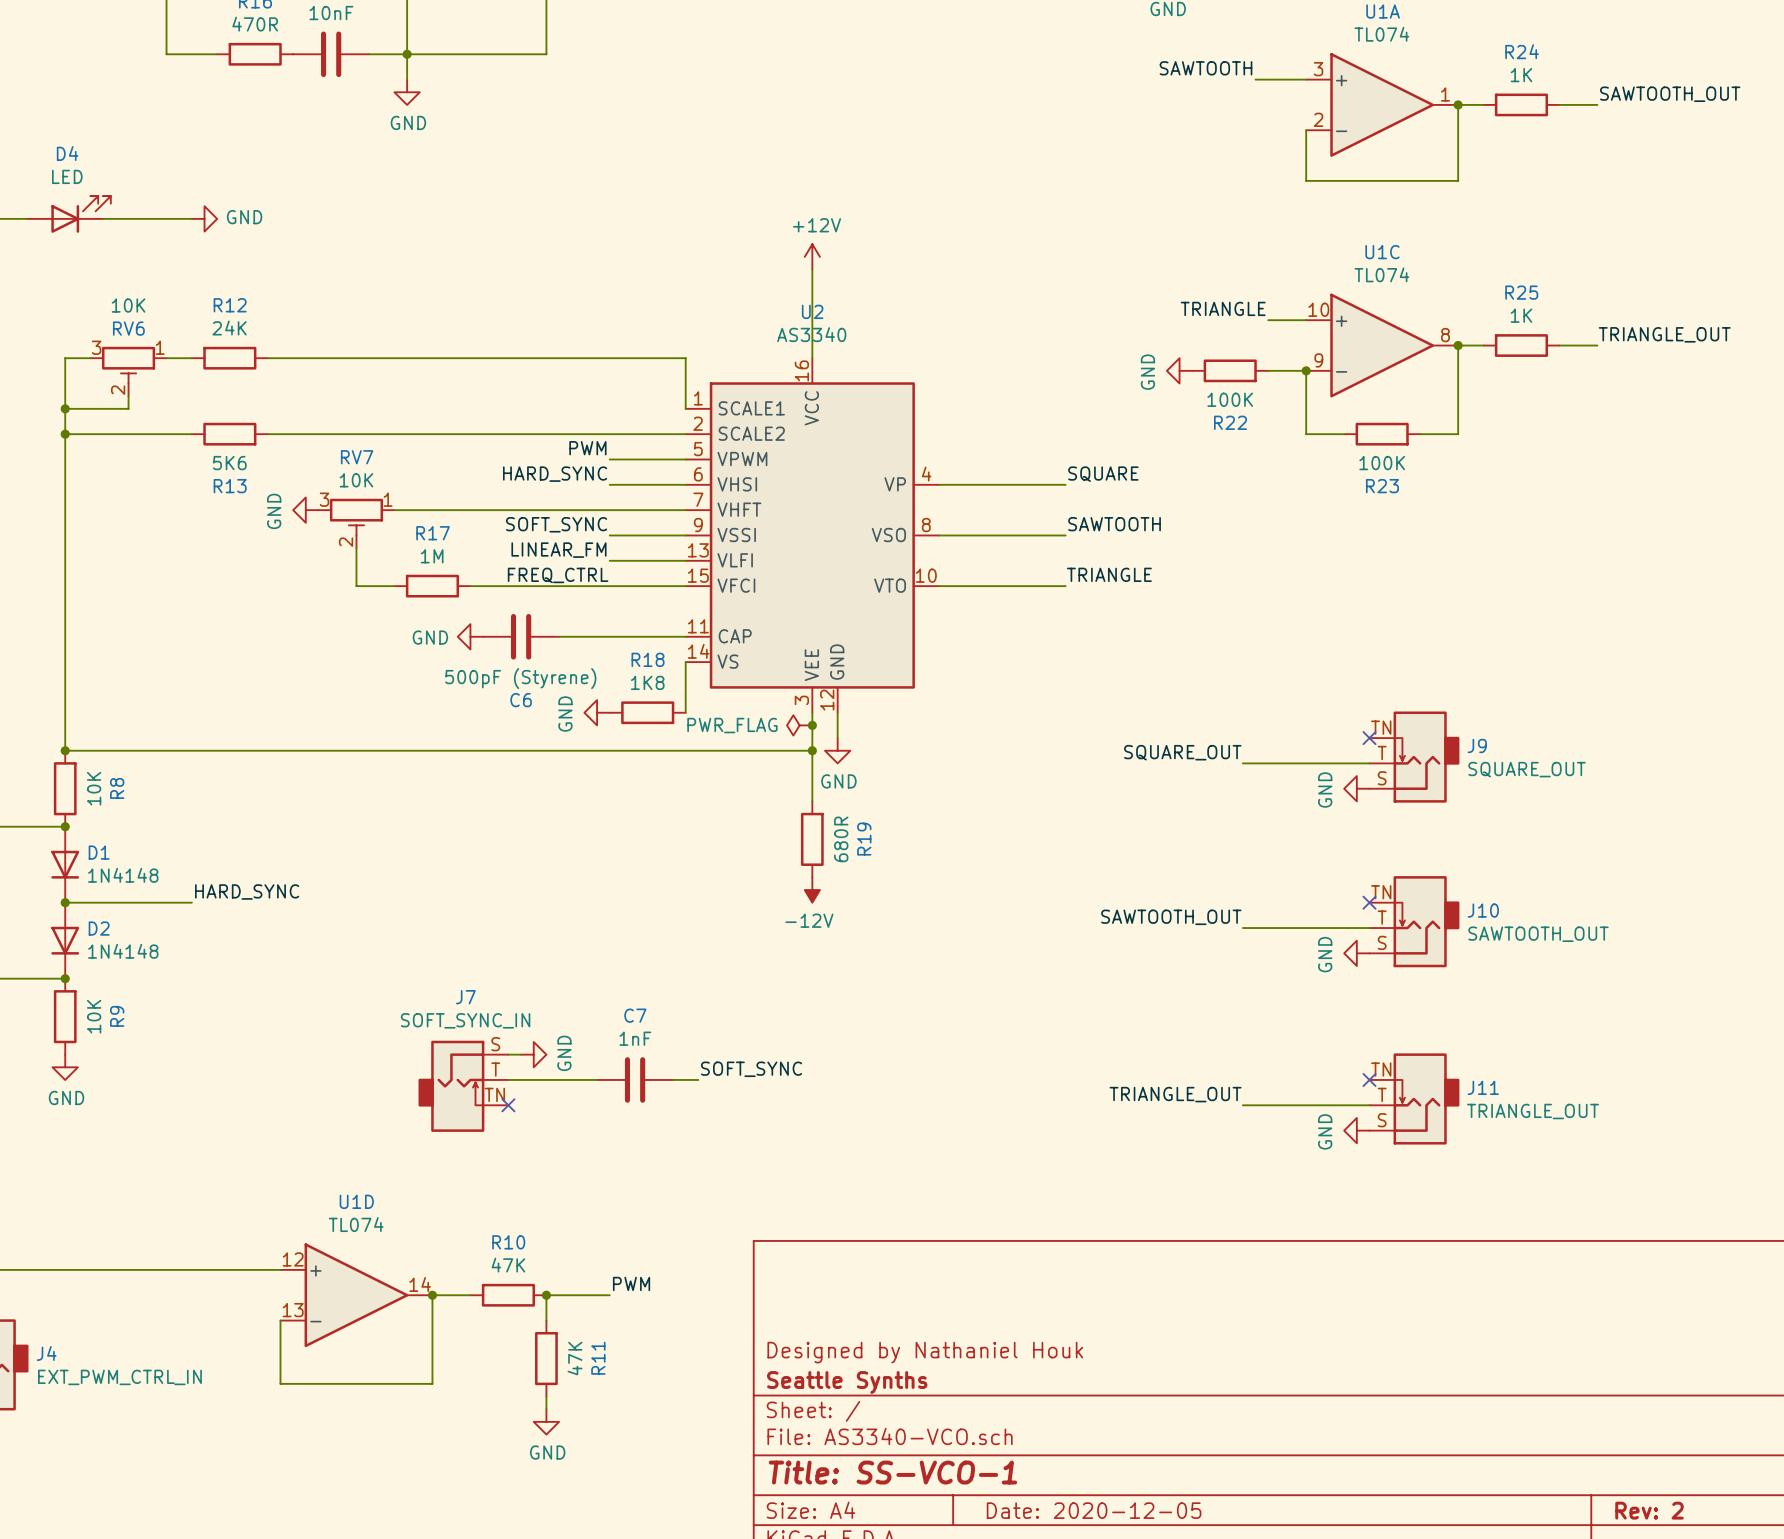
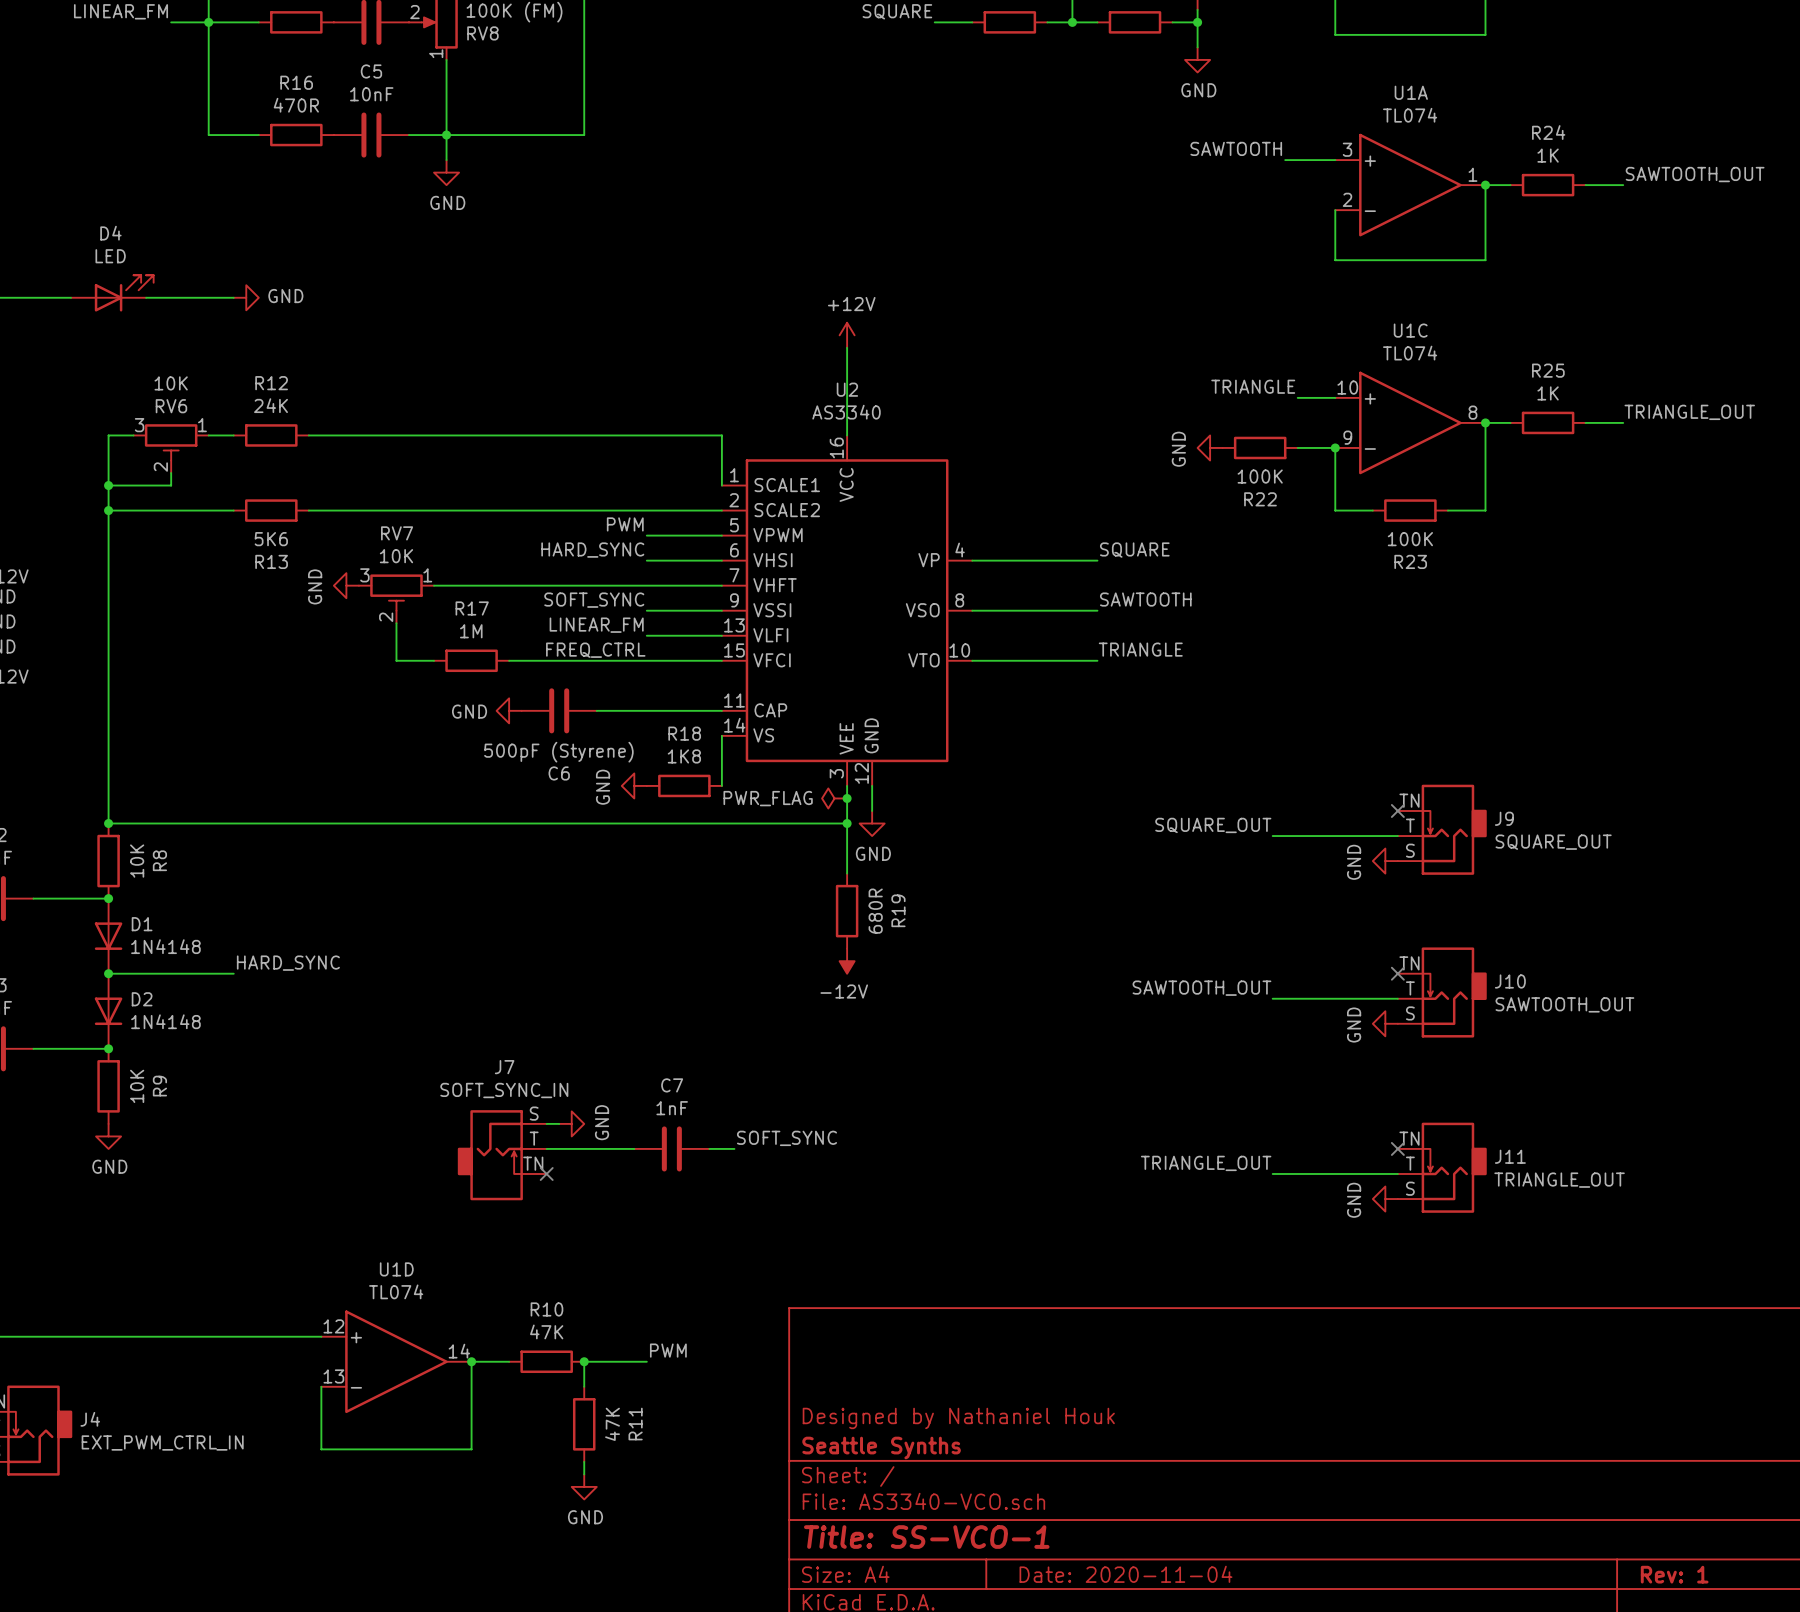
title block: Date: 2020-12-05 (1094, 1510) -> Date: 2020-11-04 (1125, 1574)
title block: Rev: 2 (1649, 1510) -> Rev: 1 (1674, 1574)

